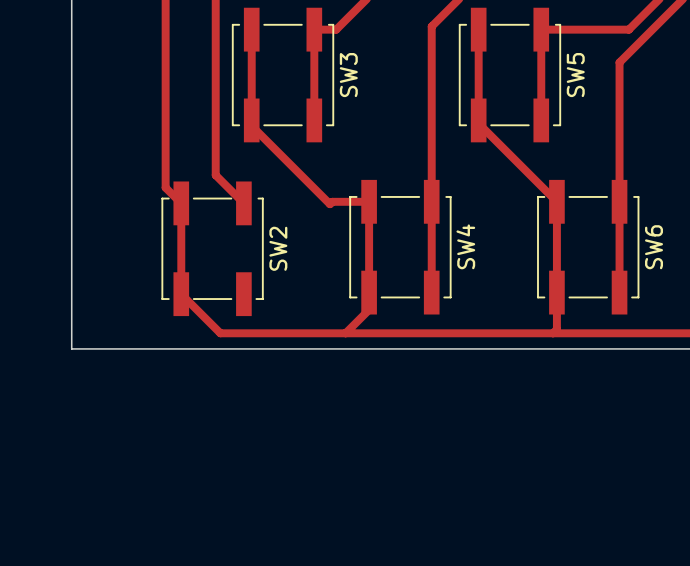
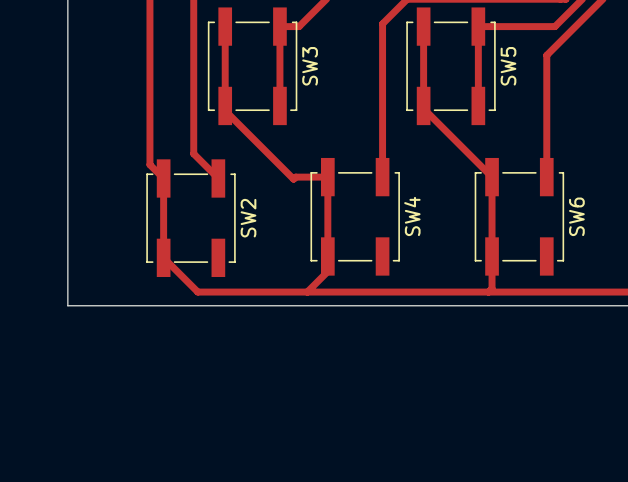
track: (431, 201) (431, 292) -> none
track: (619, 201) (619, 292) -> none

